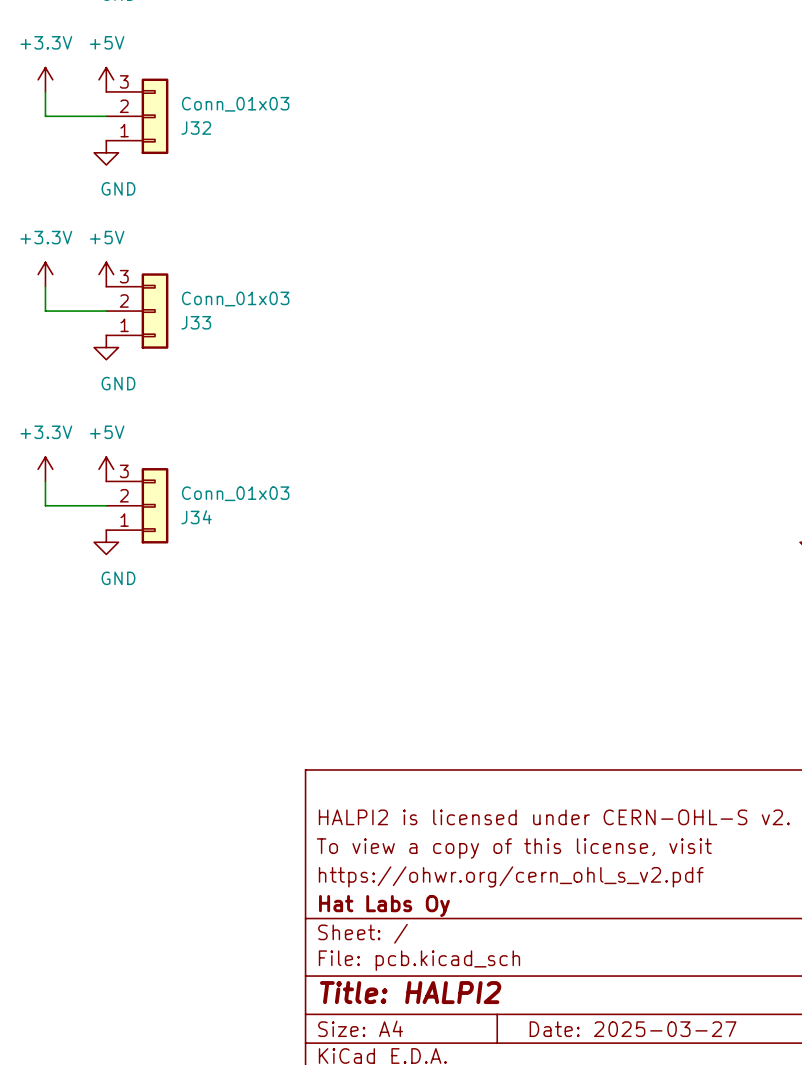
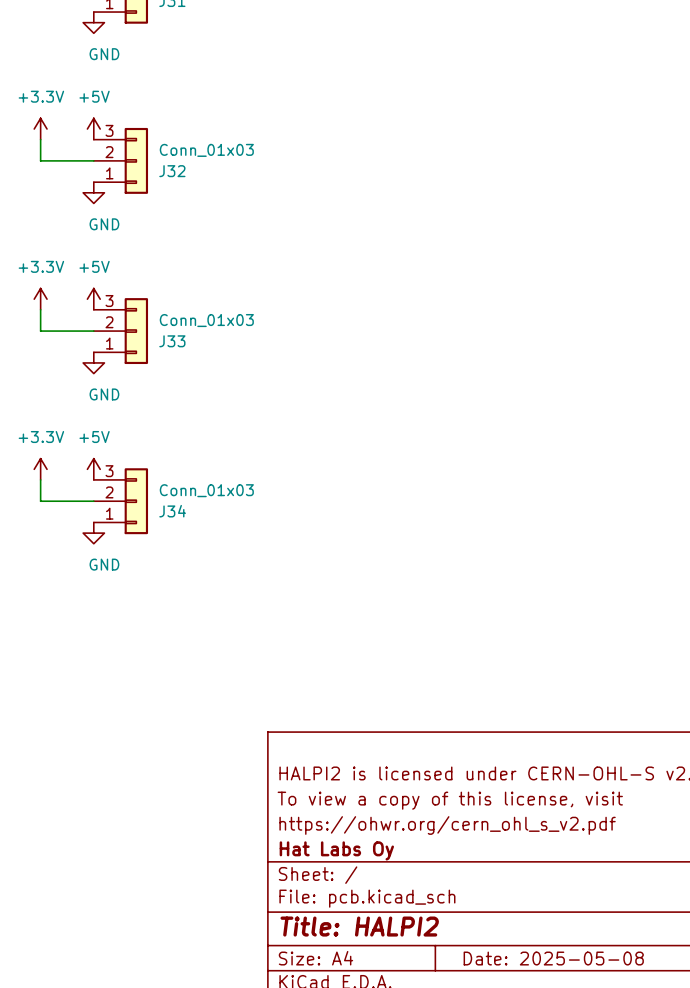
title block: Date: 2025-03-27 (633, 1029) -> Date: 2025-05-08 (553, 958)

